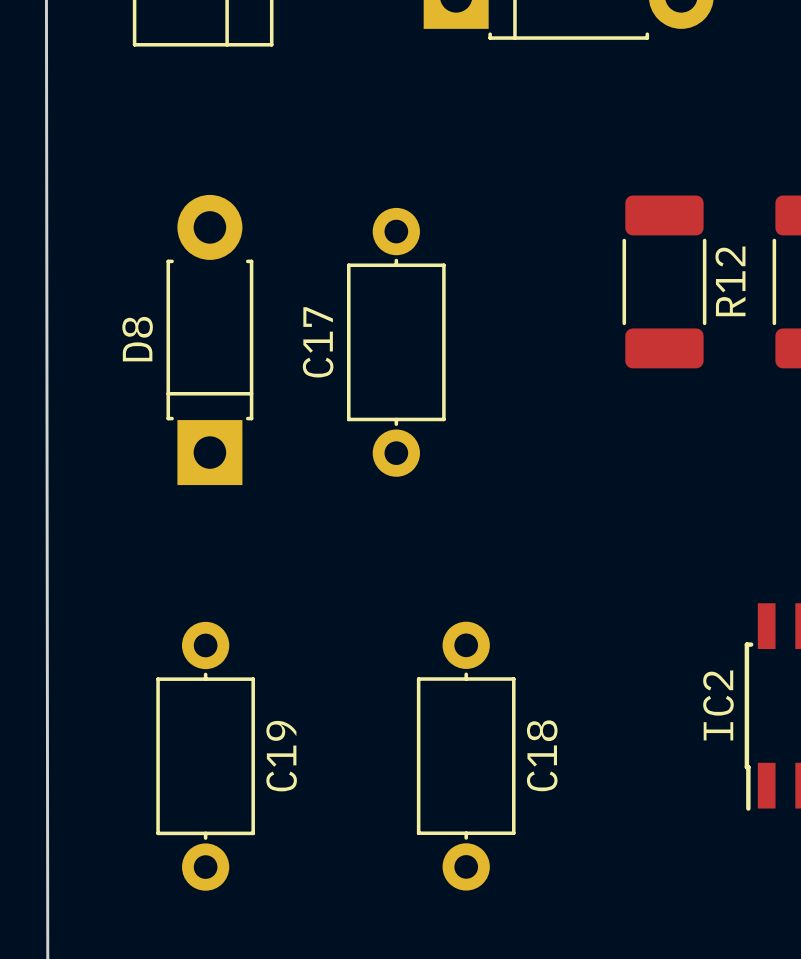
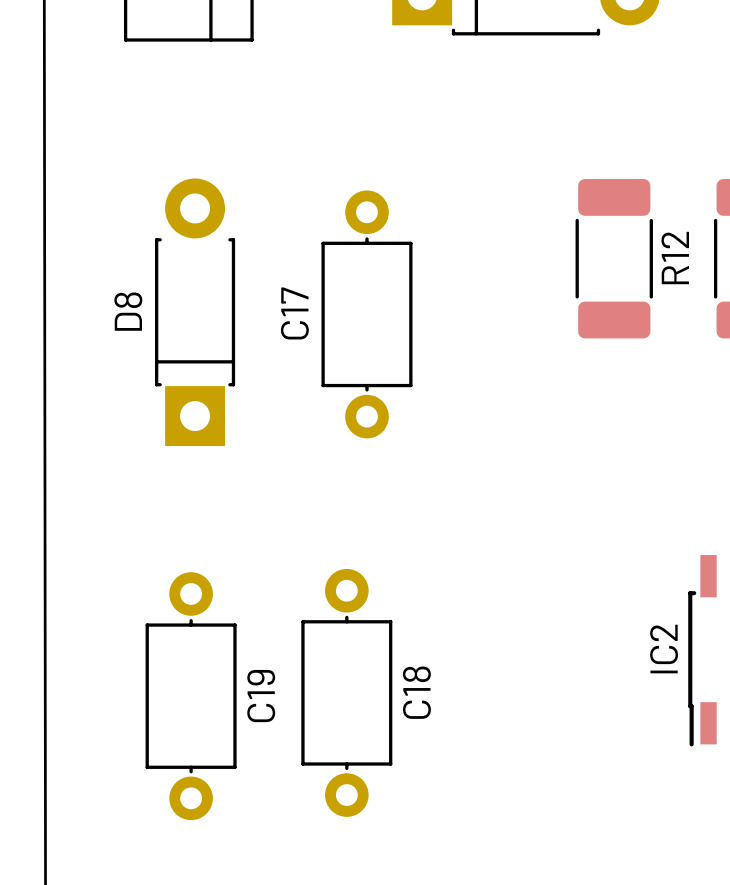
C18 position: (466, 756) -> (346, 692)

